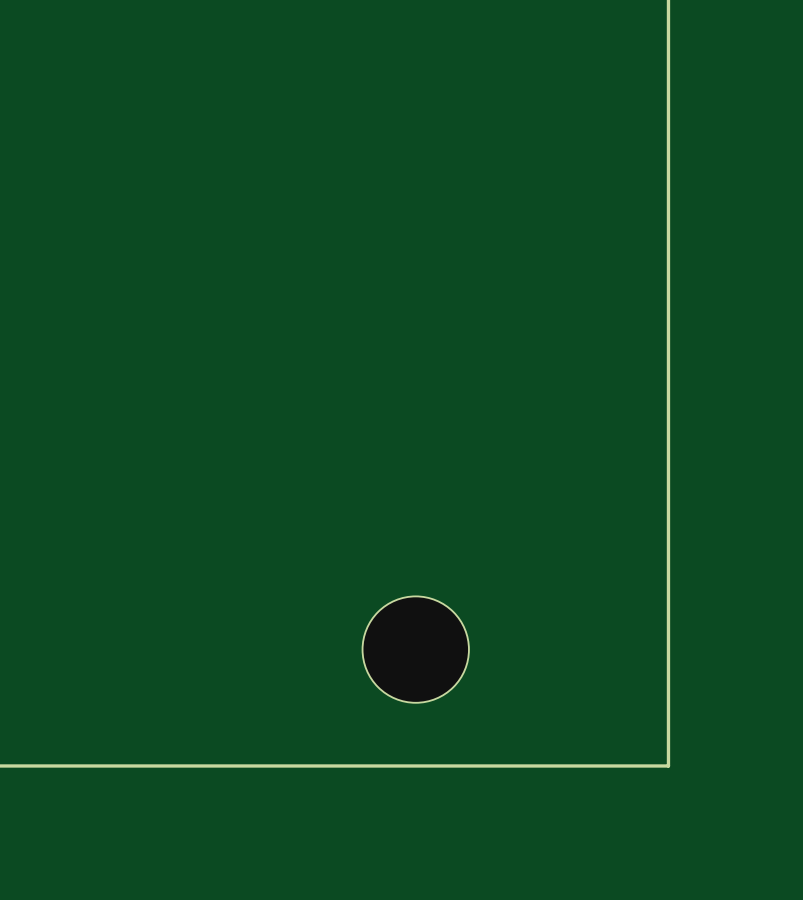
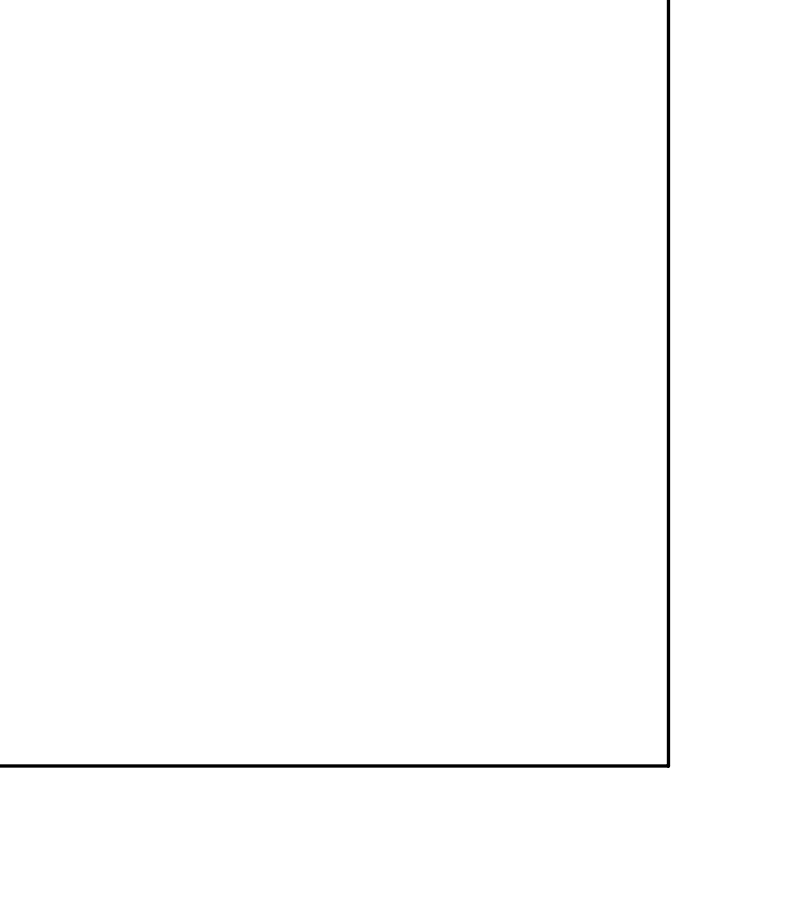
part: (415, 649) -> none

